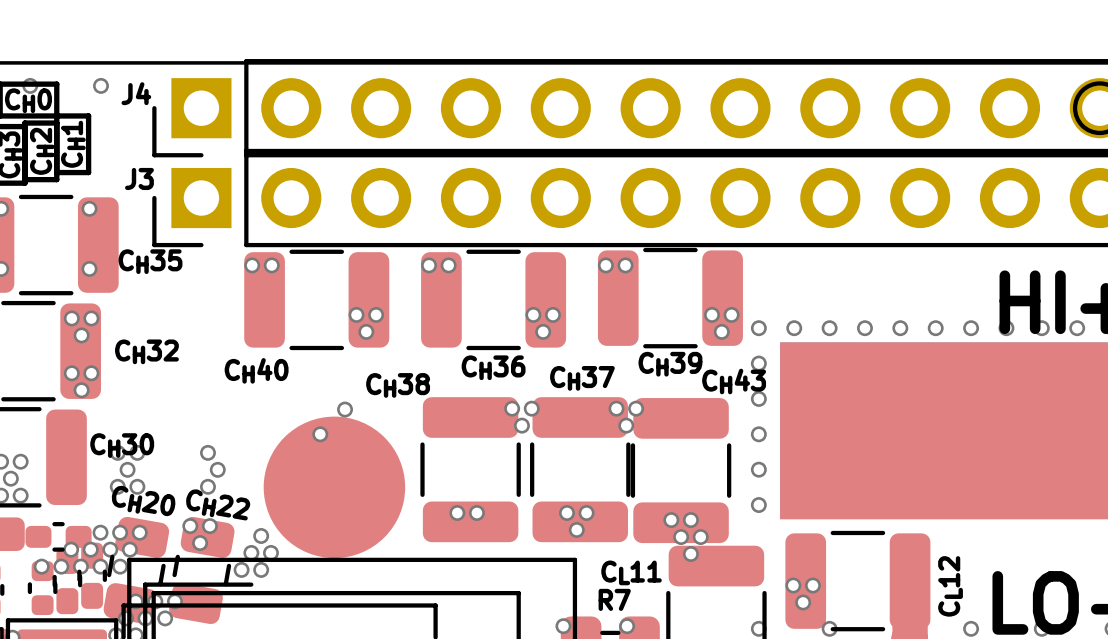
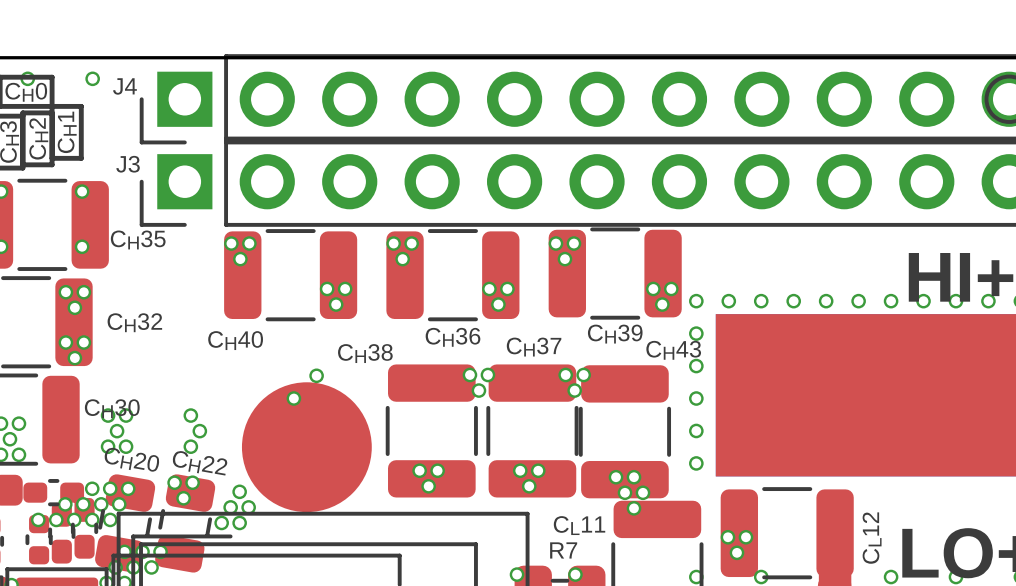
via: none -> (240, 259)
via: none -> (402, 259)
via: none -> (564, 259)
via: none -> (428, 486)

